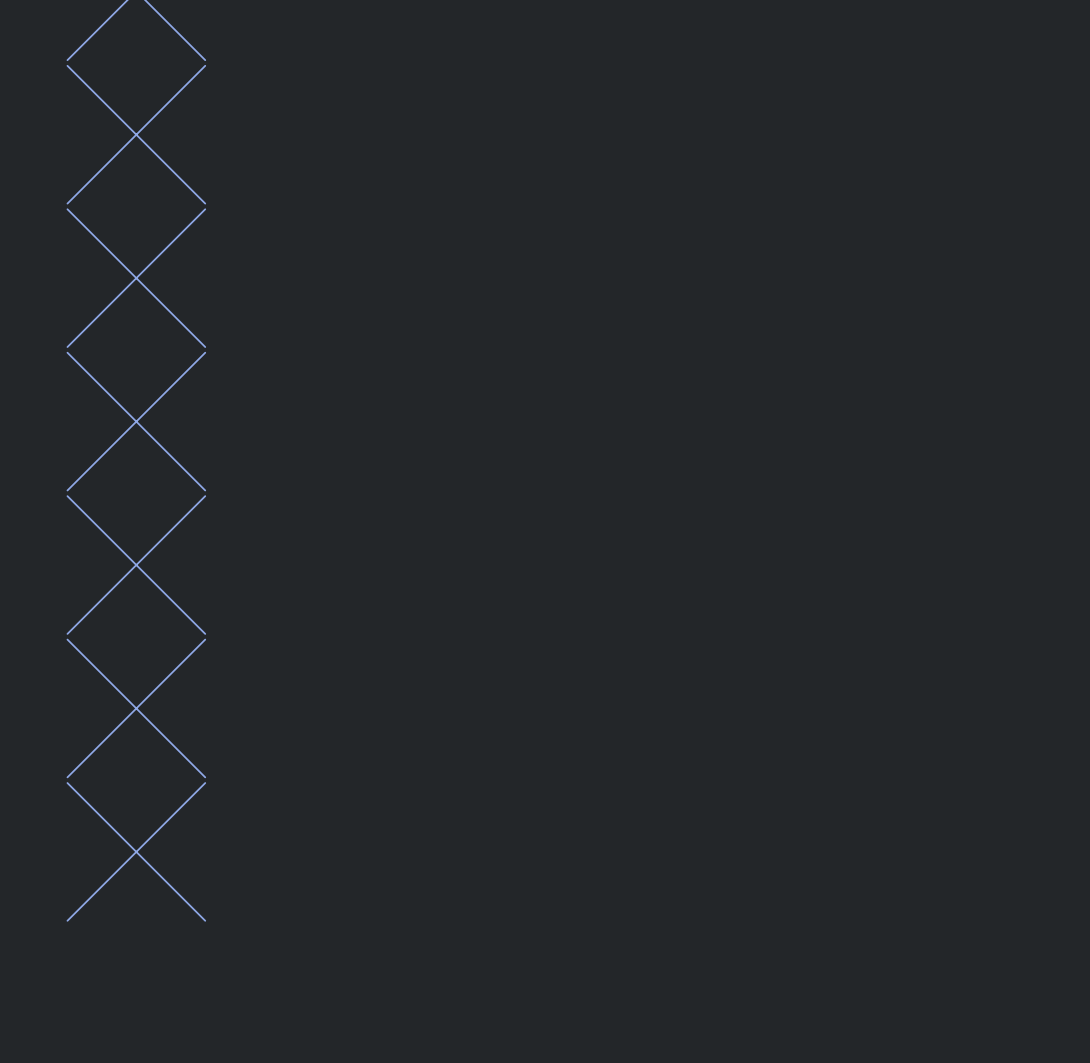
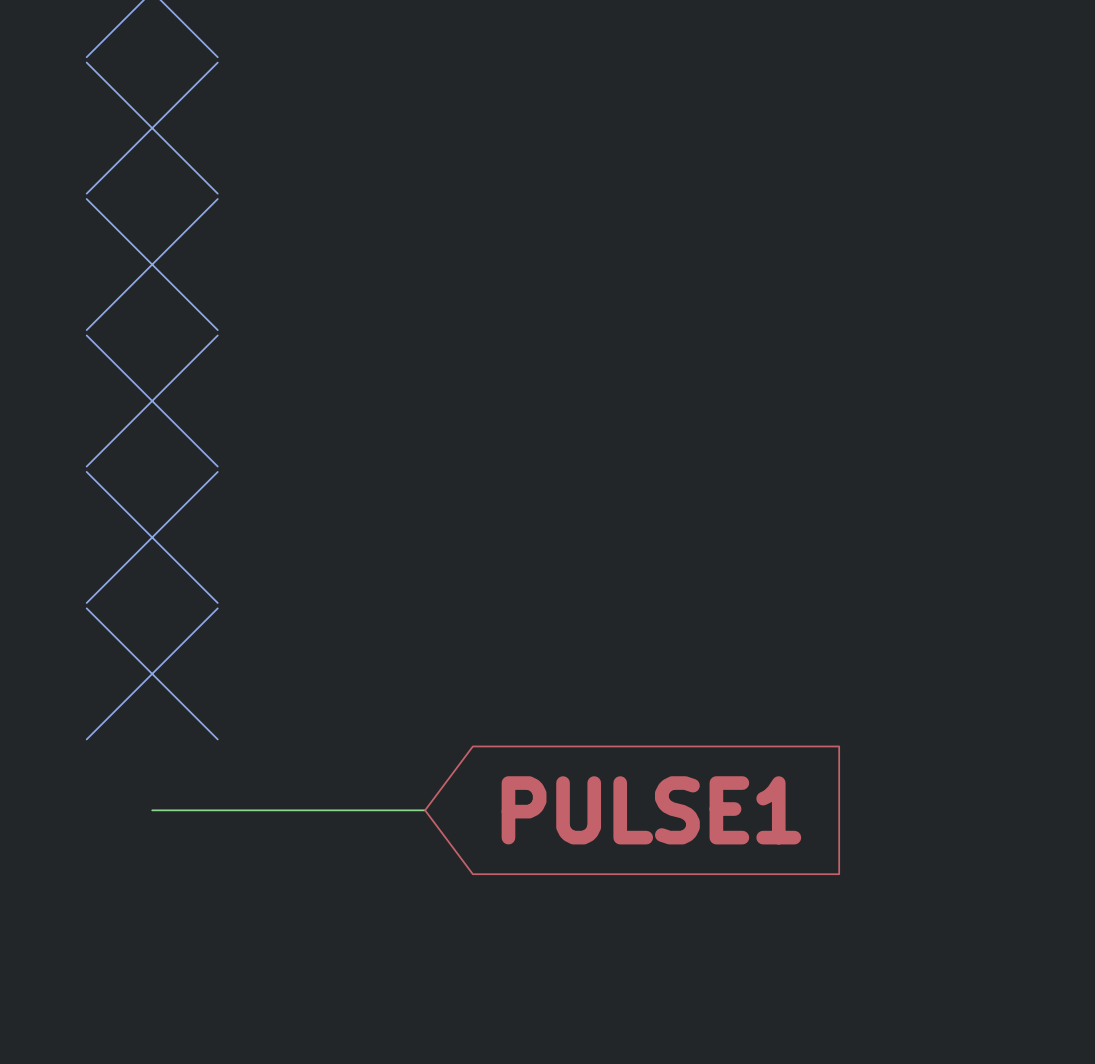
wire: none -> (152, 810) (425, 810)
no-connect mark: (136, 851) -> none
global label: none -> PULSE1 (651, 810)

